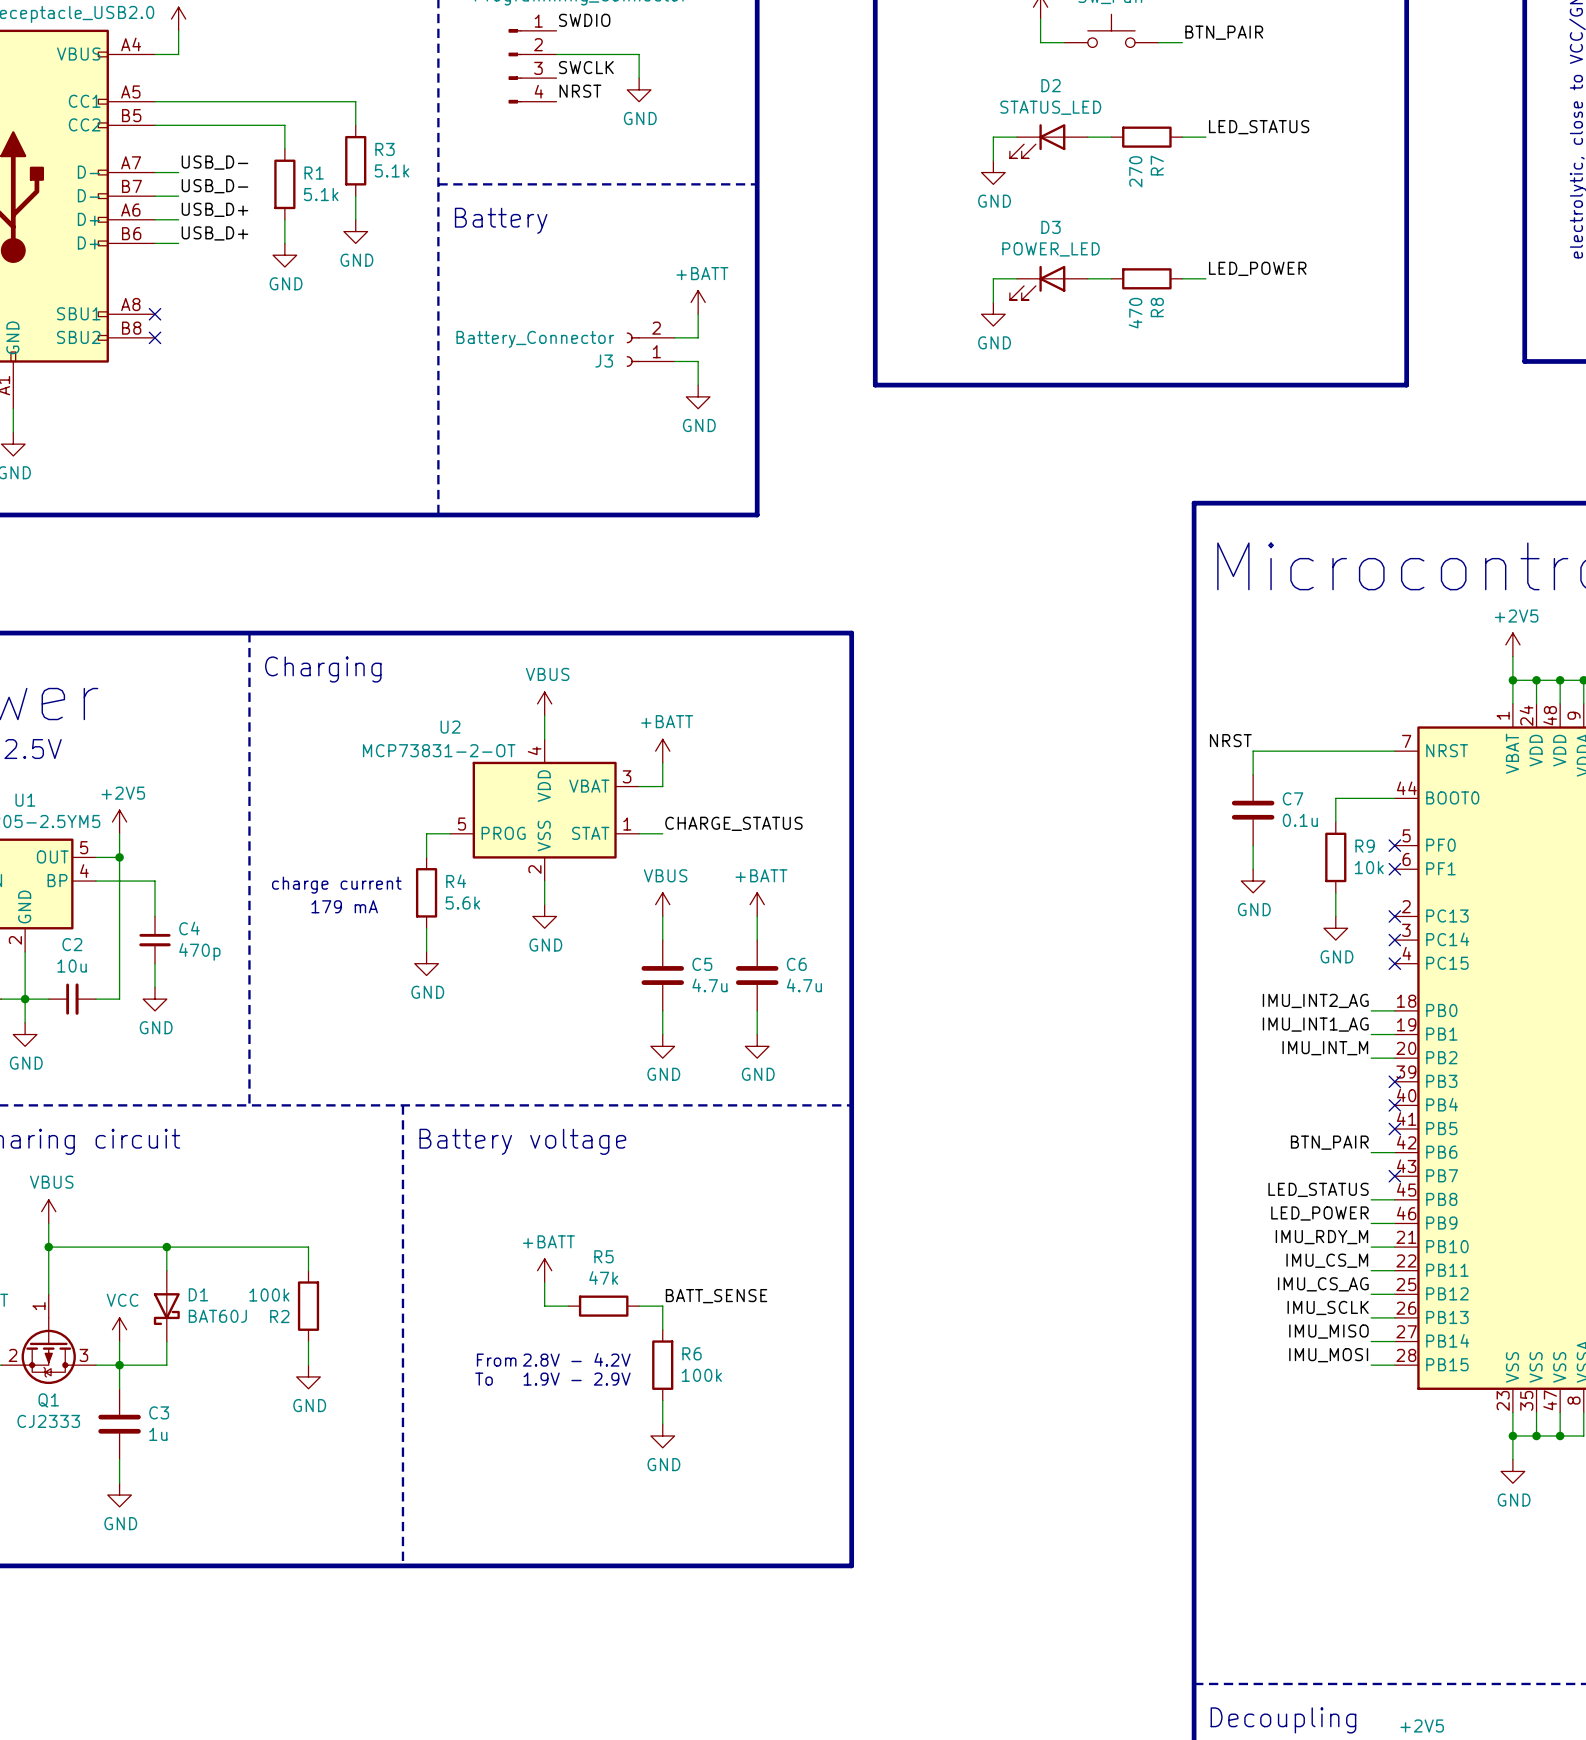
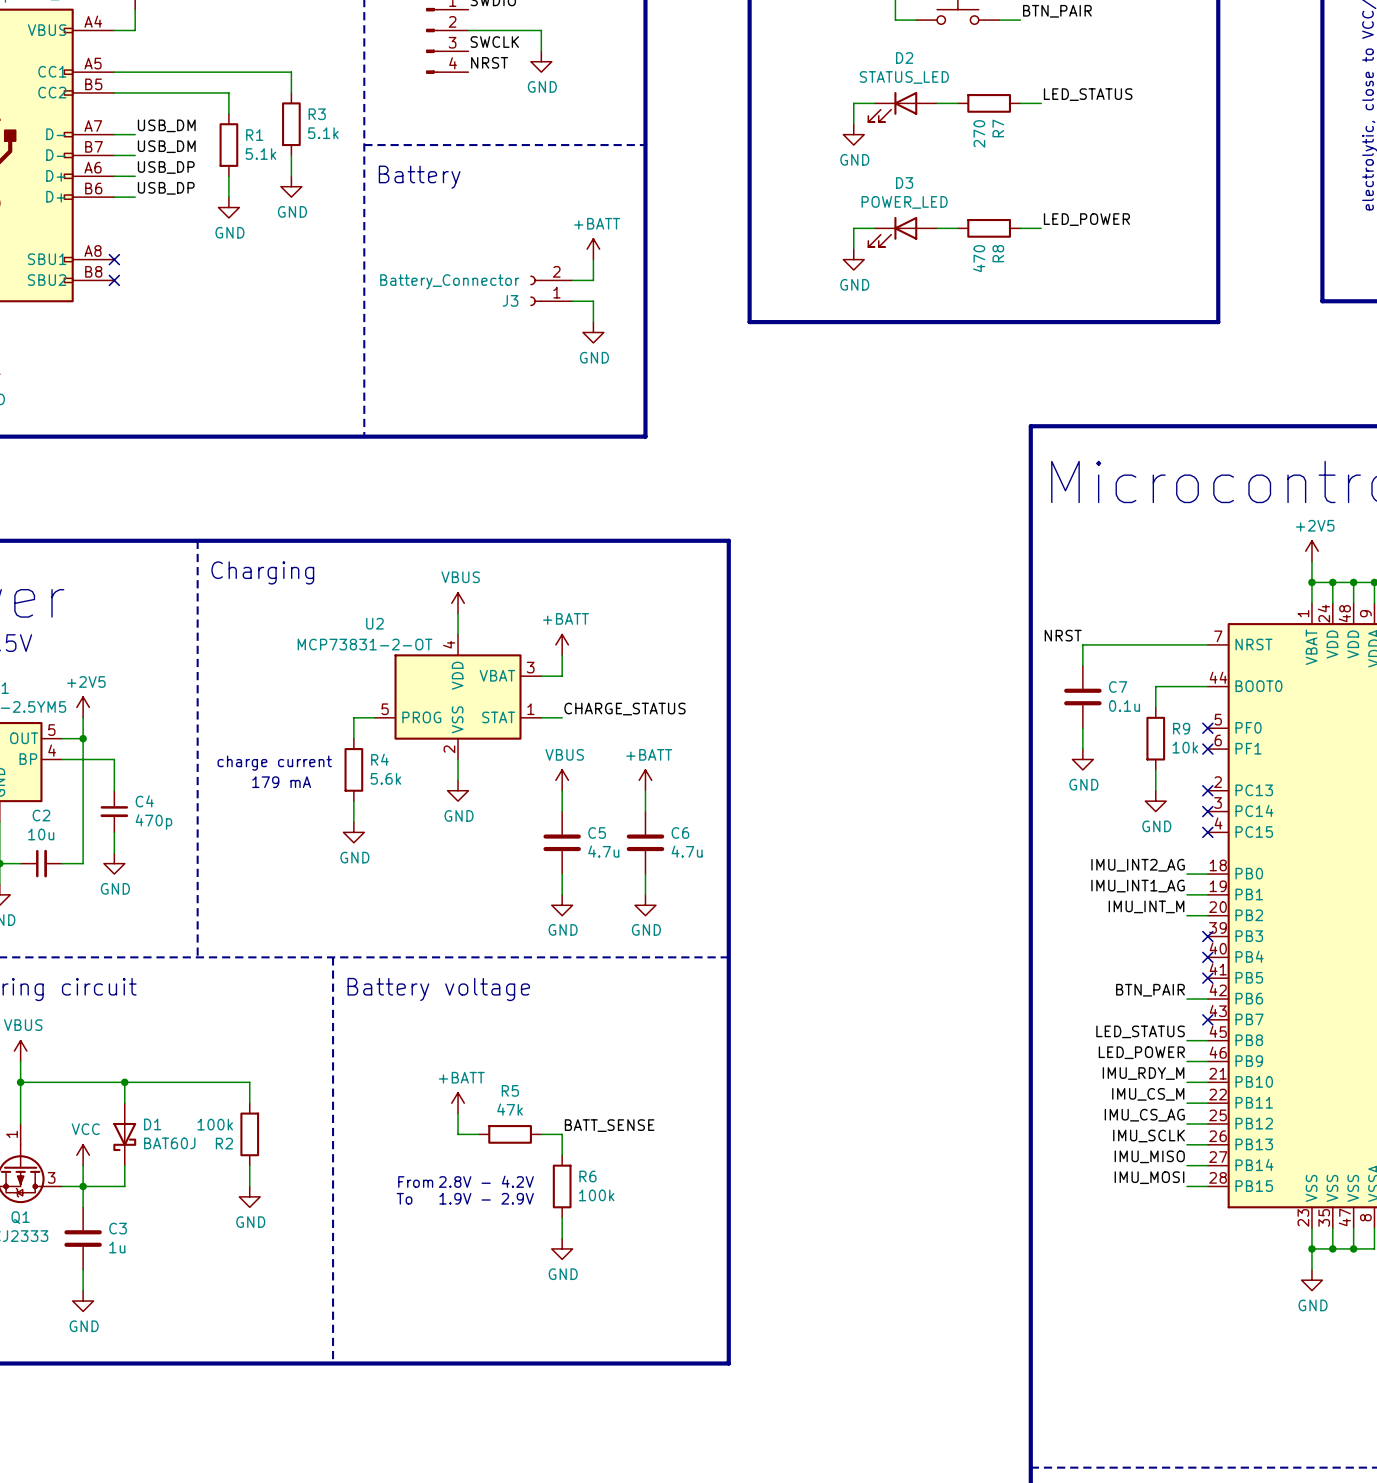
label: USB_D- (214, 162) -> USB_DM (166, 125)
label: USB_D- (214, 186) -> USB_DM (166, 146)
label: USB_D+ (214, 209) -> USB_DP (166, 167)
label: USB_D+ (214, 233) -> USB_DP (166, 188)

